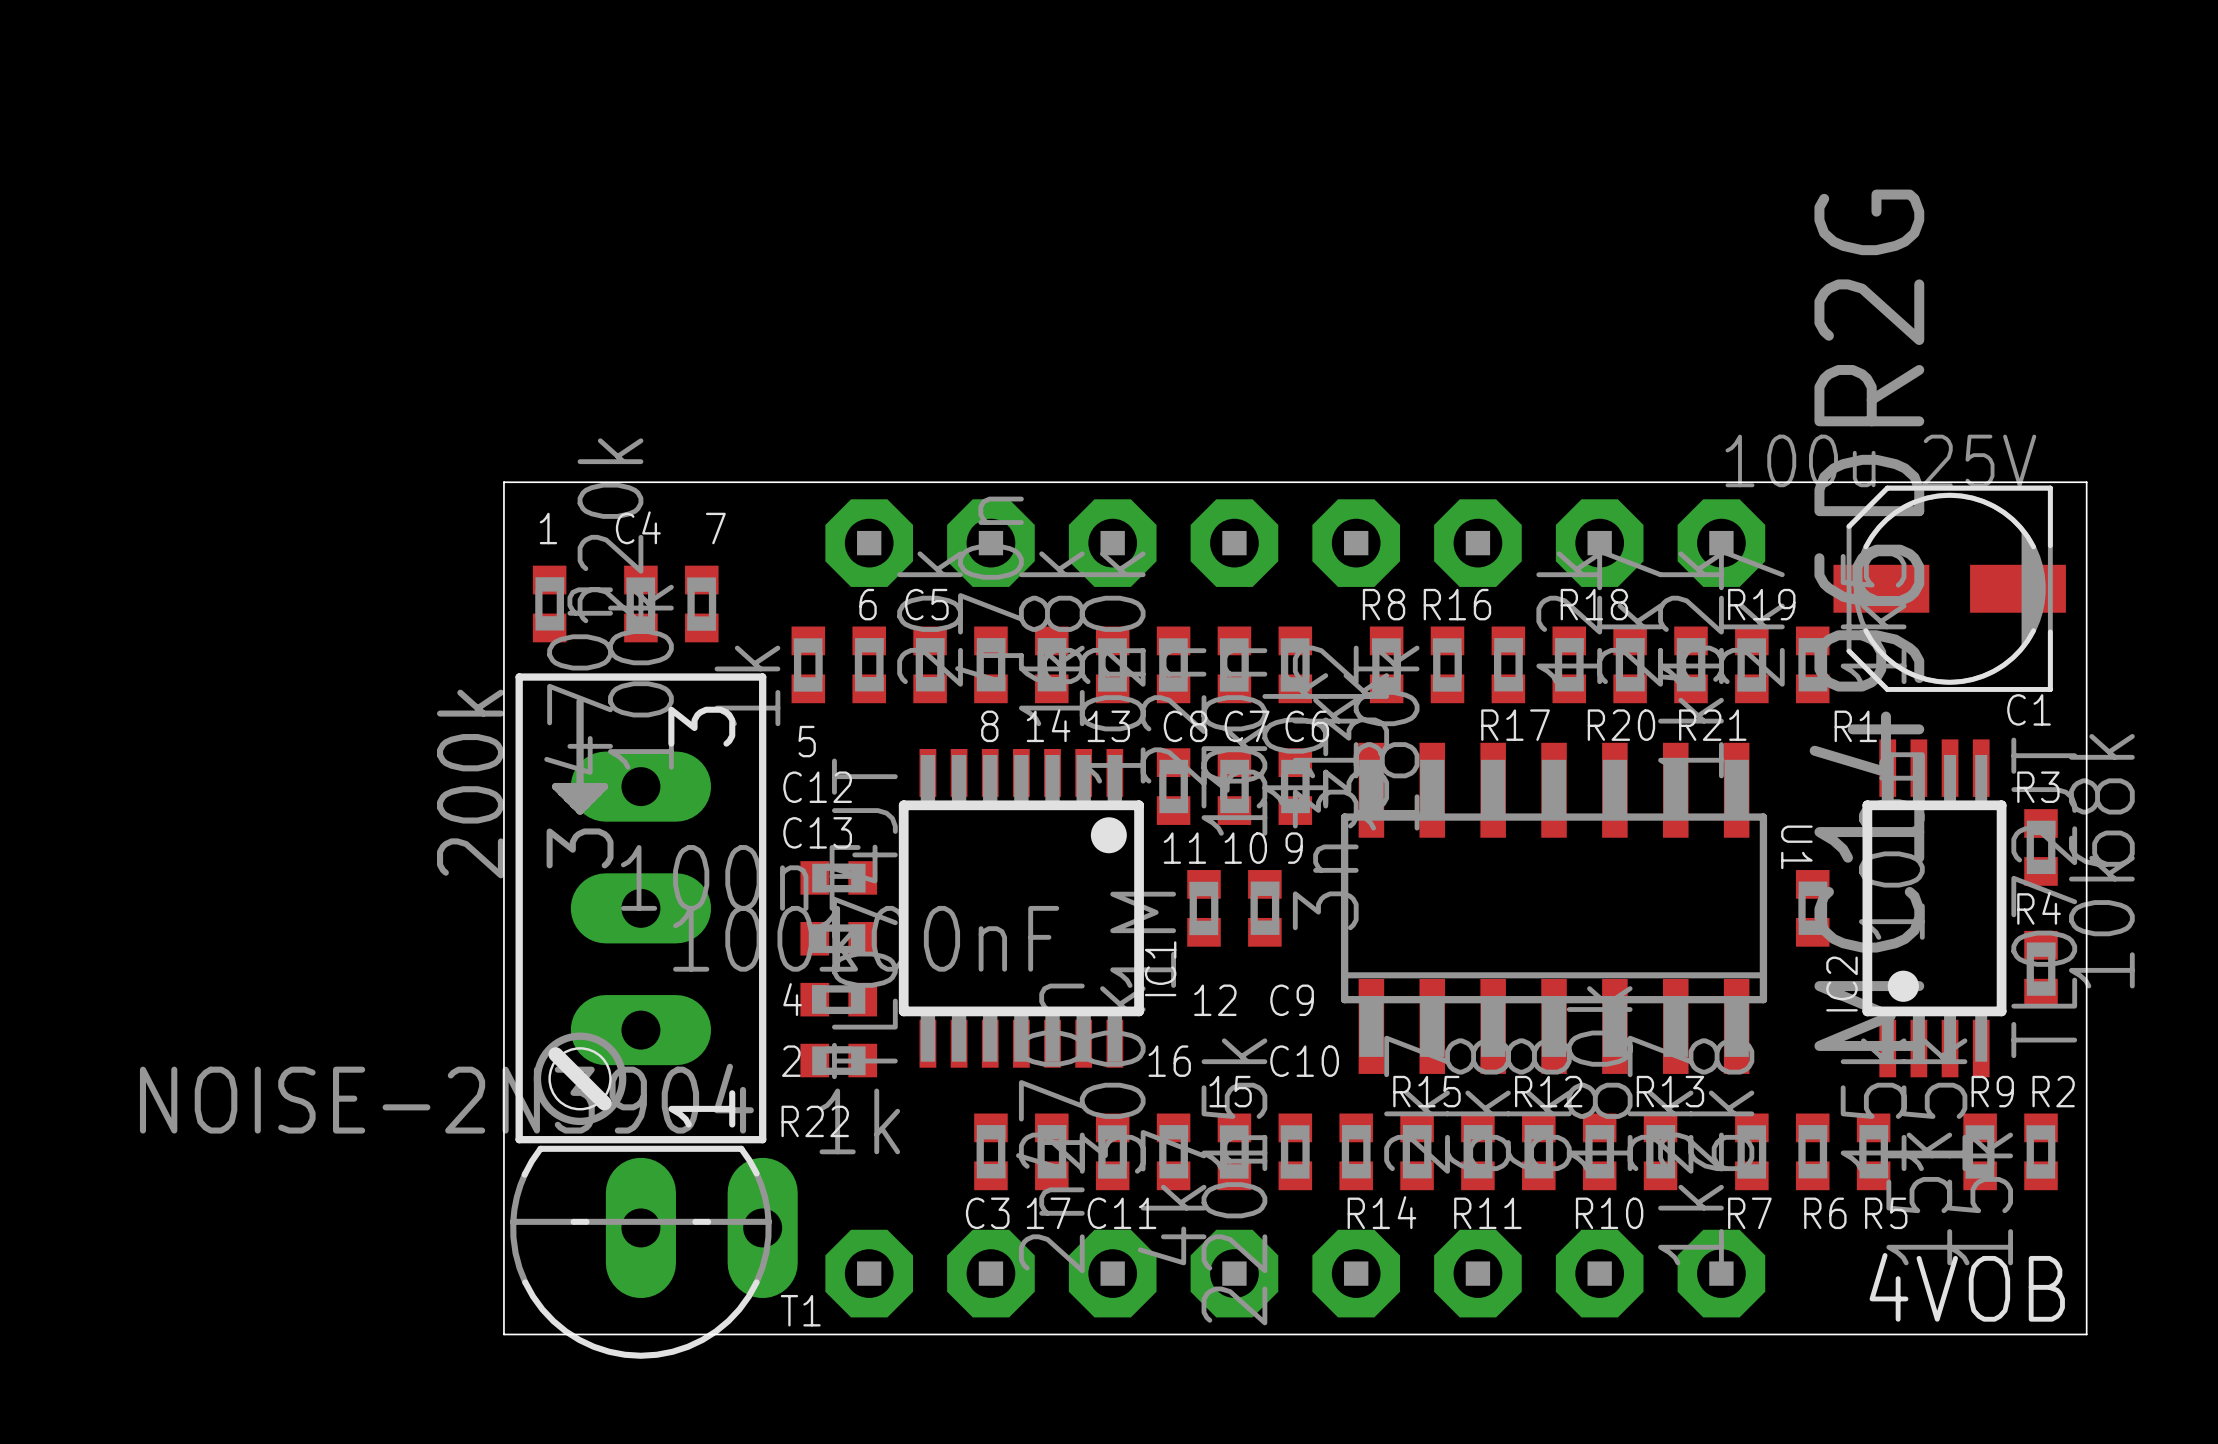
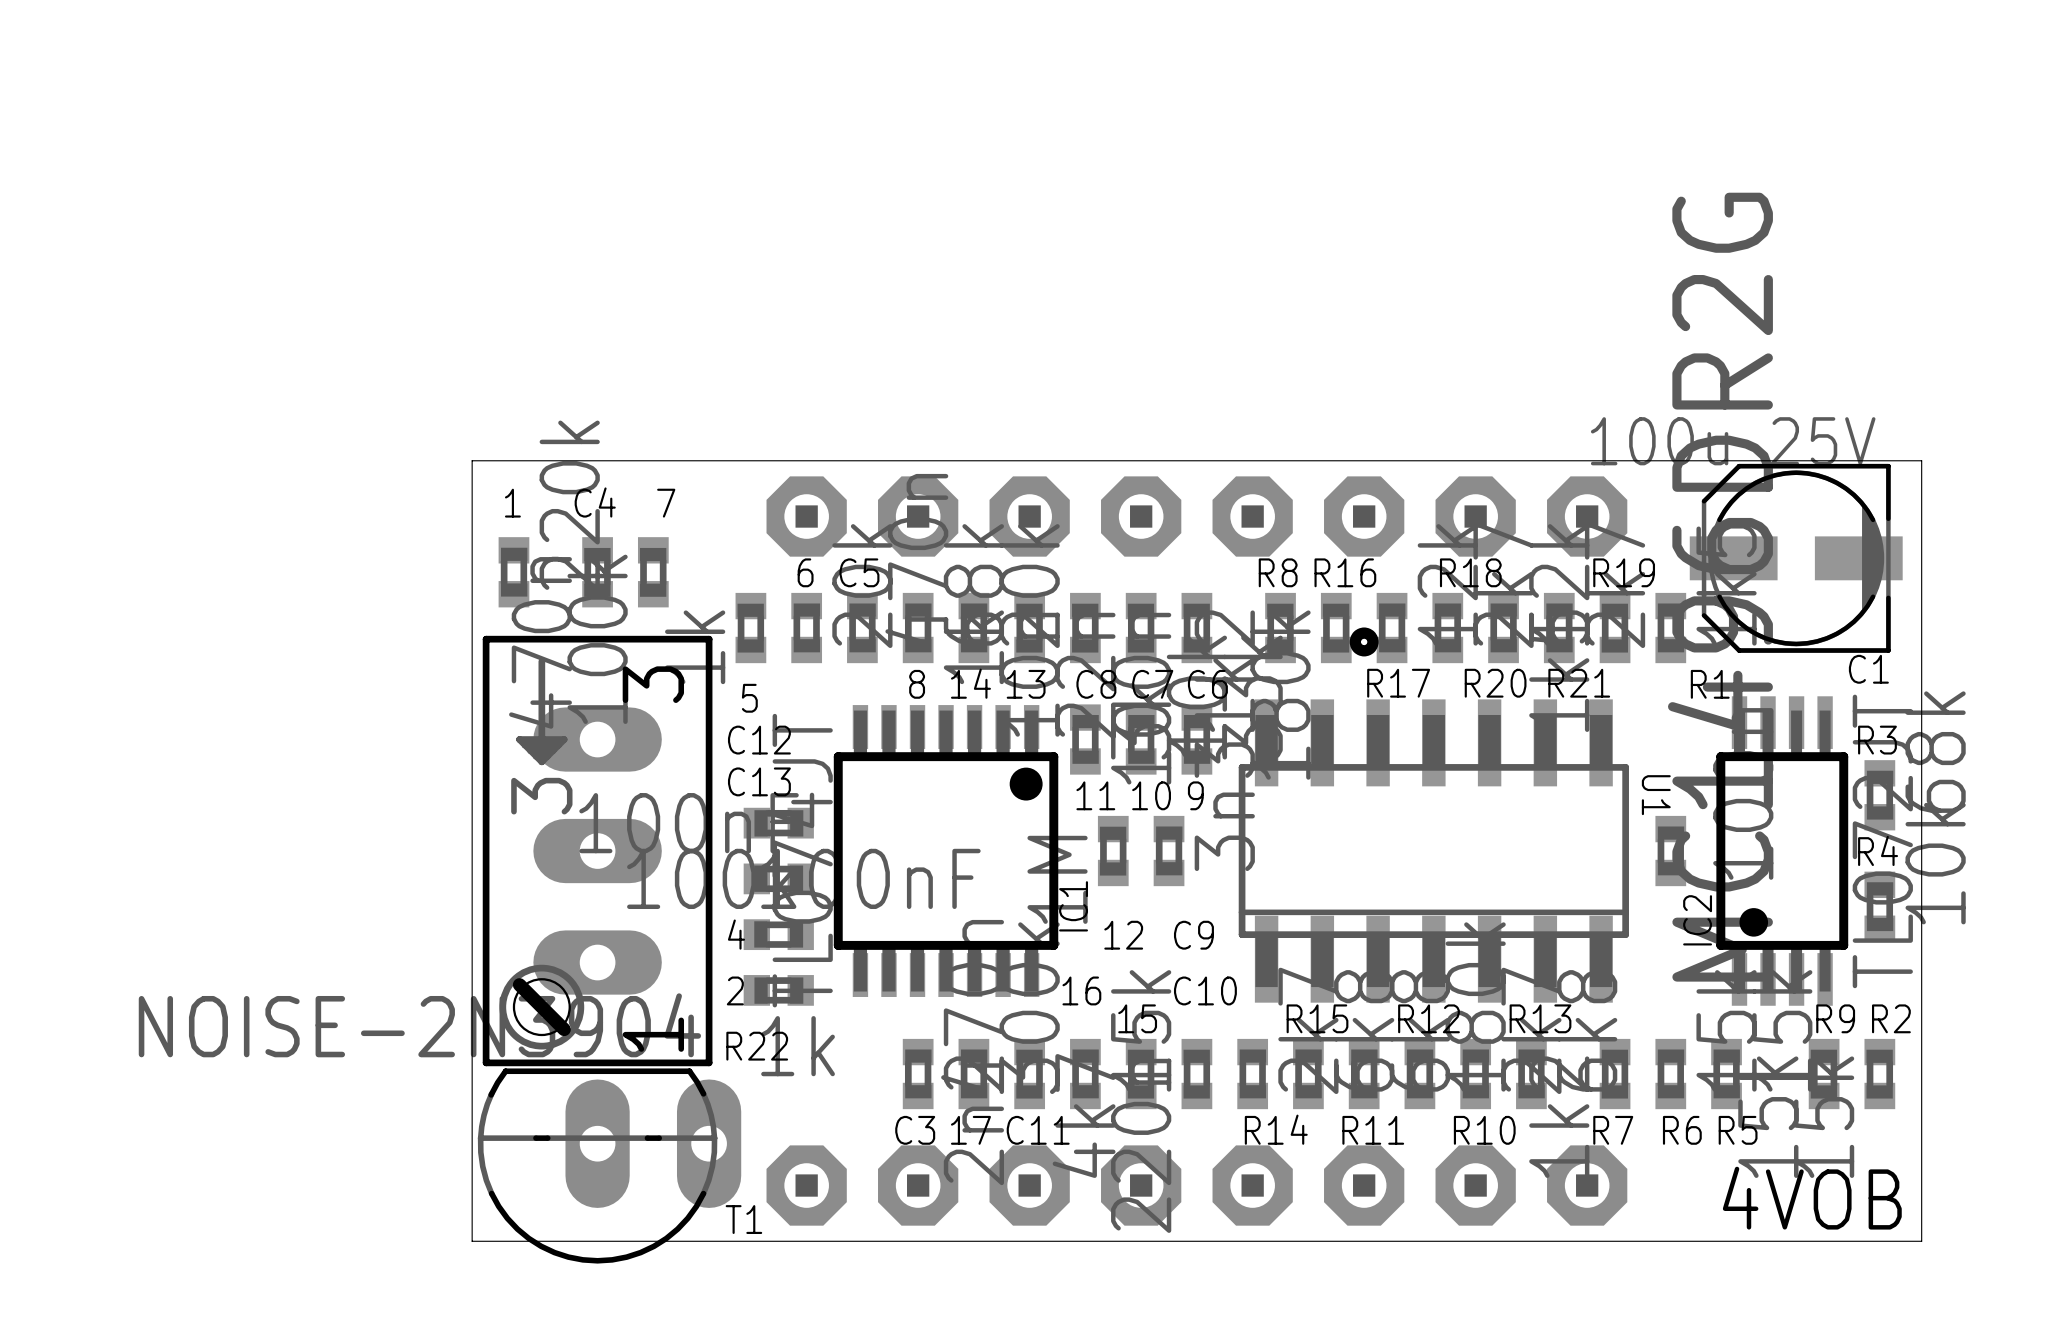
drawing: none -> [1349, 627, 1379, 657]
R22 value: 200k (470, 784) -> none

